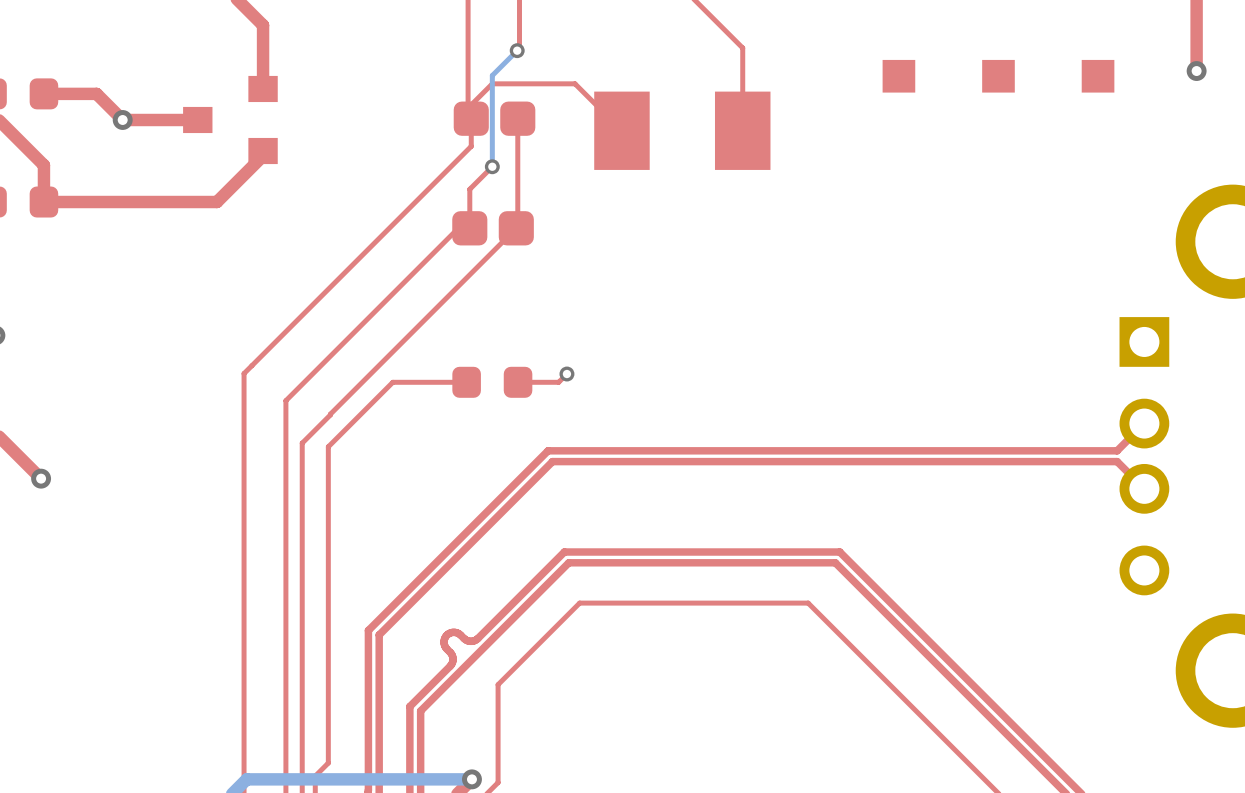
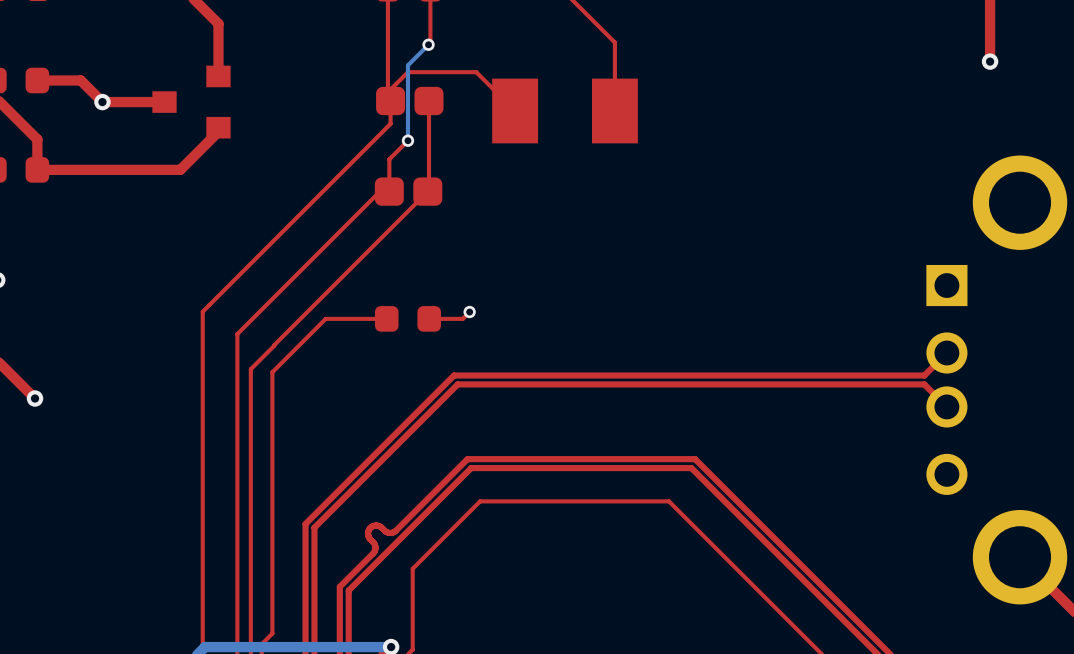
part: (898, 76) -> none
part: (998, 76) -> none
part: (1098, 76) -> none

